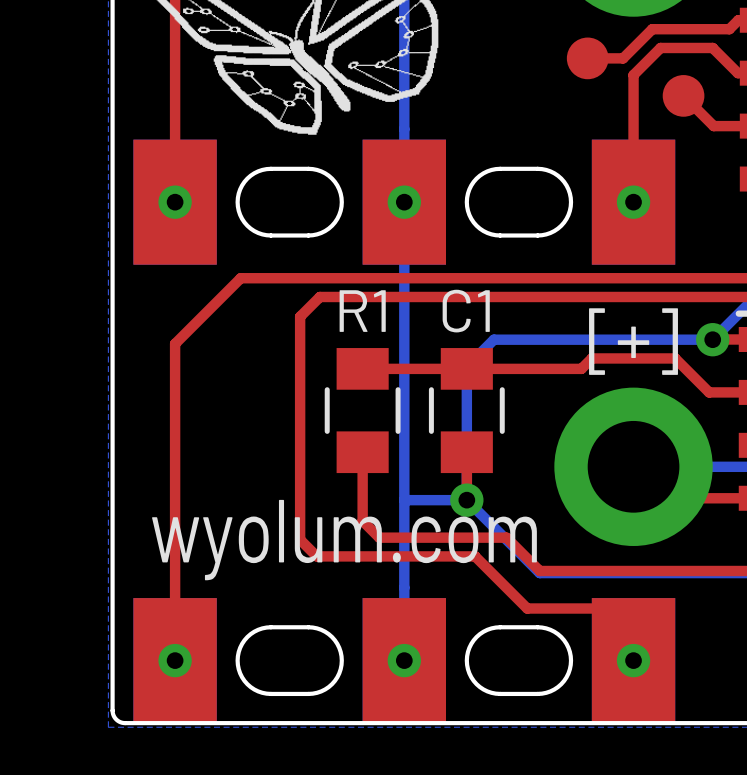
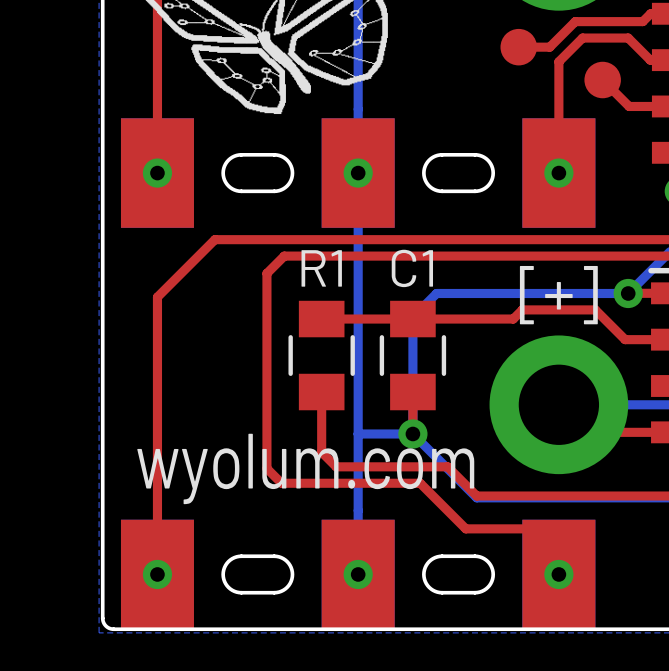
board edge: (270, 168) (312, 169) (321, 171) (332, 178) (339, 189) (341, 202) (339, 214) (332, 225) (321, 232) (308, 235) (266, 235) (258, 232) (247, 225) (238, 210) (237, 202) (240, 189) (250, 175) (262, 169) (270, 168) -> none
board edge: (500, 168) (542, 169) (554, 173) (561, 178) (568, 189) (571, 202) (568, 214) (561, 225) (550, 232) (537, 235) (495, 235) (487, 232) (476, 225) (469, 214) (467, 206) (469, 189) (476, 178) (483, 173) (500, 168) -> none
board edge: none -> (241, 154) (274, 154) (283, 157) (291, 168) (290, 182) (285, 187) (276, 191) (241, 191) (232, 188) (224, 180) (223, 168) (230, 158) (241, 154)
board edge: none -> (442, 154) (474, 154) (484, 157) (492, 168) (490, 182) (486, 187) (477, 191) (442, 191) (432, 188) (425, 180) (424, 168) (431, 158) (442, 154)
board edge: (270, 627) (312, 627) (325, 631) (332, 637) (339, 647) (341, 660) (339, 673) (332, 684) (321, 691) (308, 693) (266, 693) (258, 691) (247, 684) (238, 669) (237, 660) (240, 647) (250, 634) (262, 628) (270, 627) -> none
board edge: (500, 627) (542, 627) (554, 631) (561, 637) (568, 647) (571, 660) (568, 673) (561, 684) (554, 689) (542, 693) (500, 693) (487, 691) (476, 684) (469, 673) (467, 664) (469, 647) (476, 637) (483, 631) (500, 627) -> none
board edge: none -> (241, 556) (274, 556) (283, 558) (291, 569) (290, 583) (285, 588) (276, 592) (241, 592) (232, 590) (224, 581) (223, 569) (230, 560) (241, 556)
board edge: none -> (442, 556) (474, 556) (484, 558) (492, 569) (490, 583) (486, 588) (477, 592) (442, 592) (432, 590) (425, 581) (424, 569) (431, 560) (442, 556)

